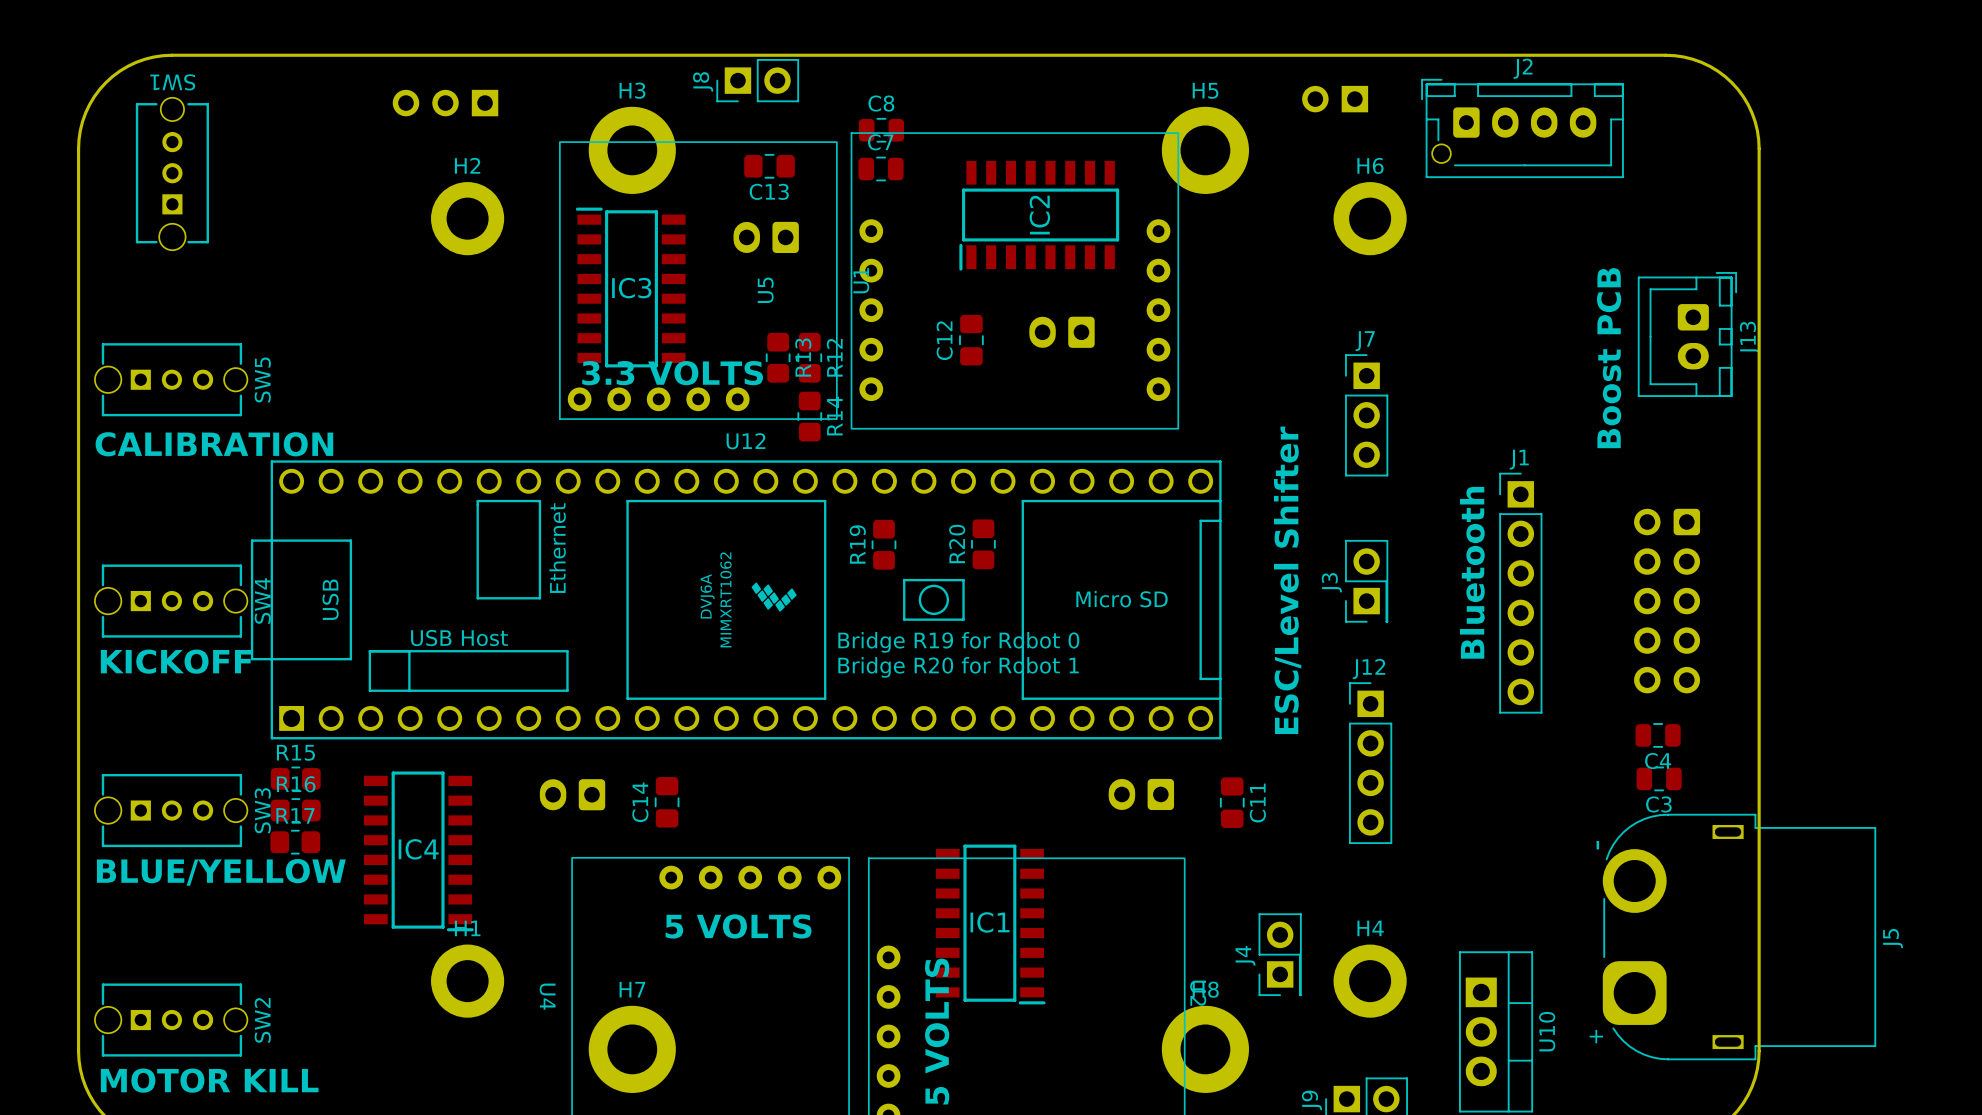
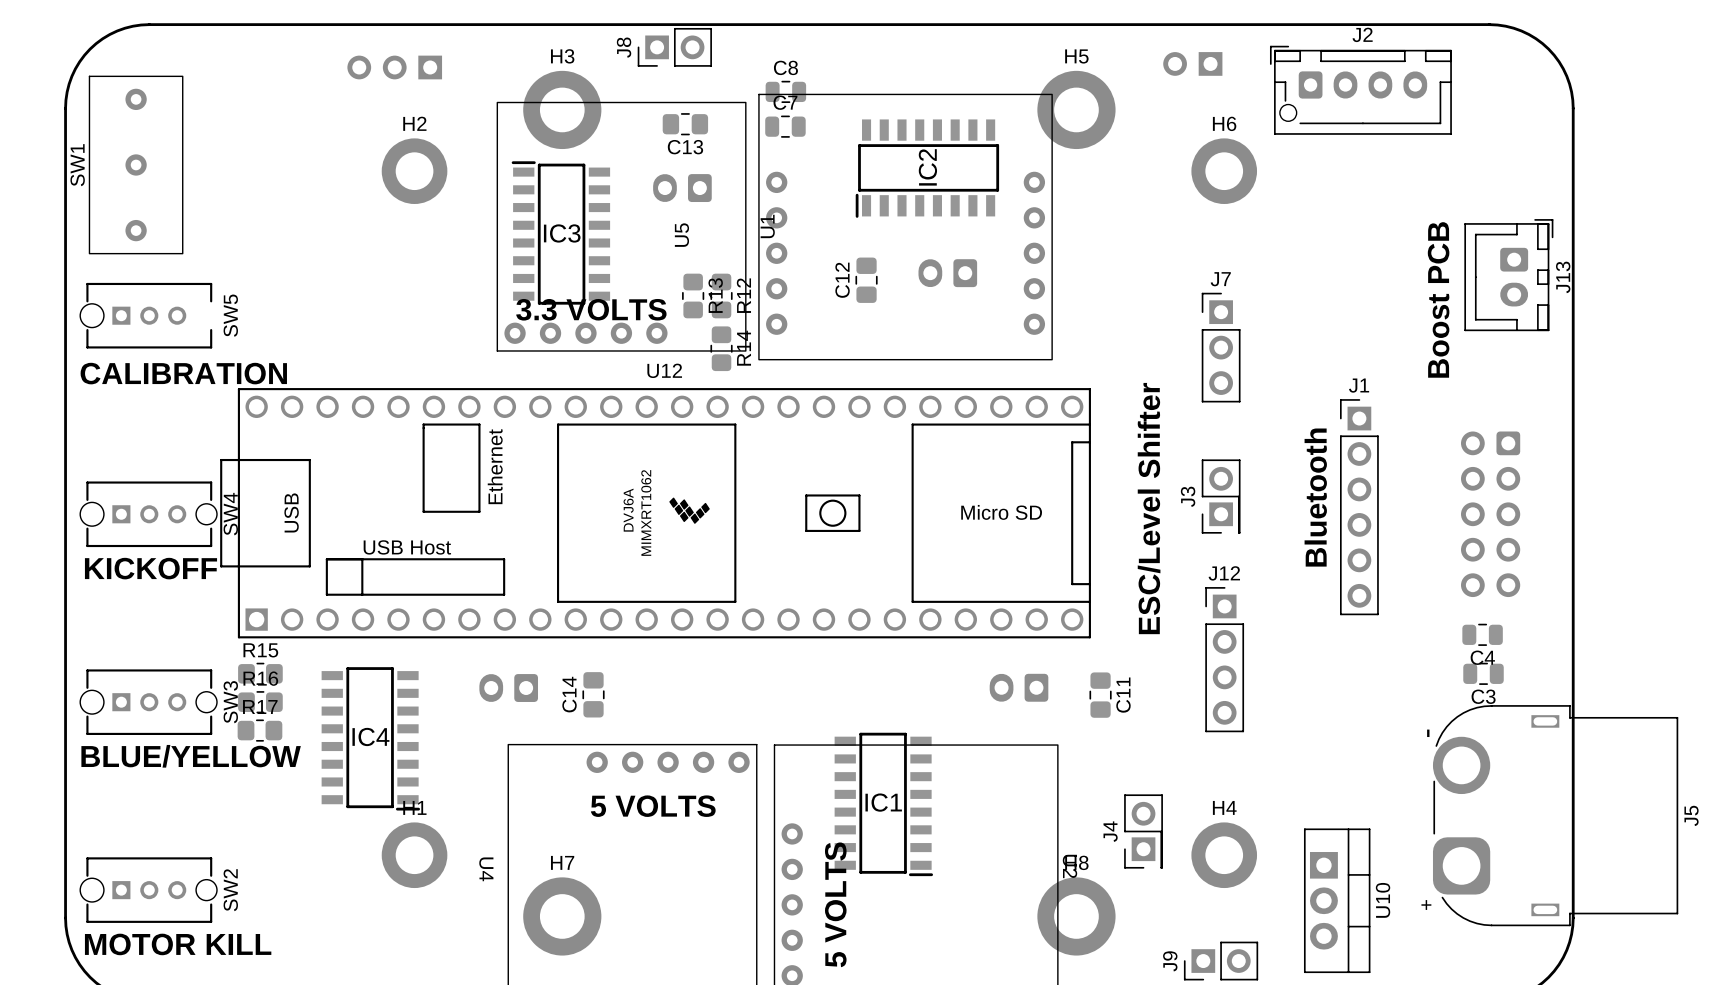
SW1 name position: SW1 (172, 82) -> SW1 (77, 165)
SW1 footprint: [135, 96, 209, 252] -> [88, 75, 184, 255]
SW5 footprint: [94, 343, 249, 417] -> [79, 282, 213, 349]
R19: (884, 544) -> none
R20: (983, 544) -> none
text: Bridge R19 for Robot 0 (958, 642) -> none
text: Bridge R20 for Robot 1 (958, 667) -> none

